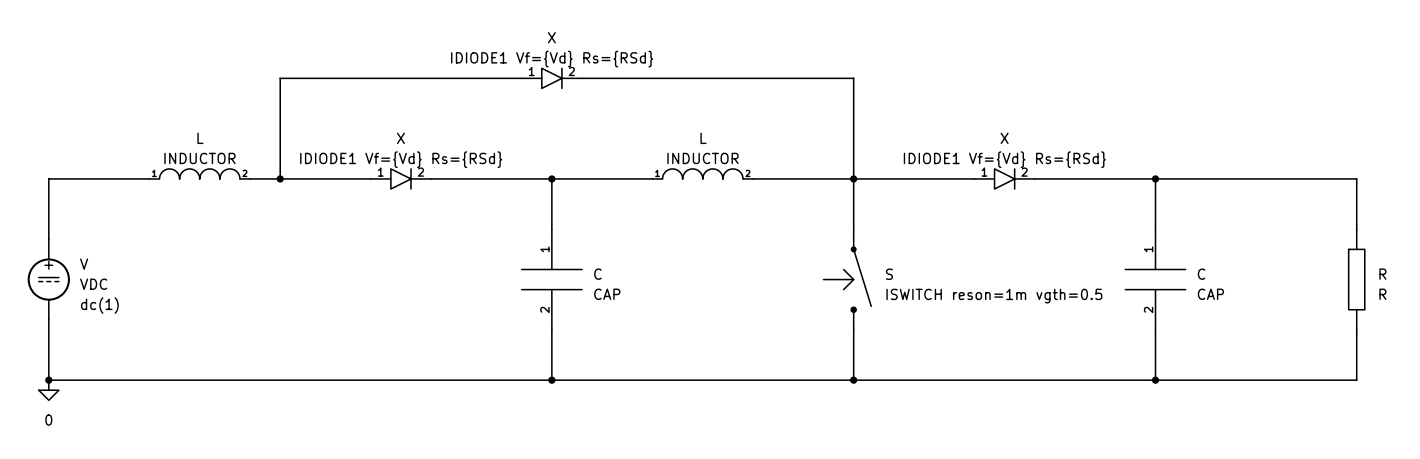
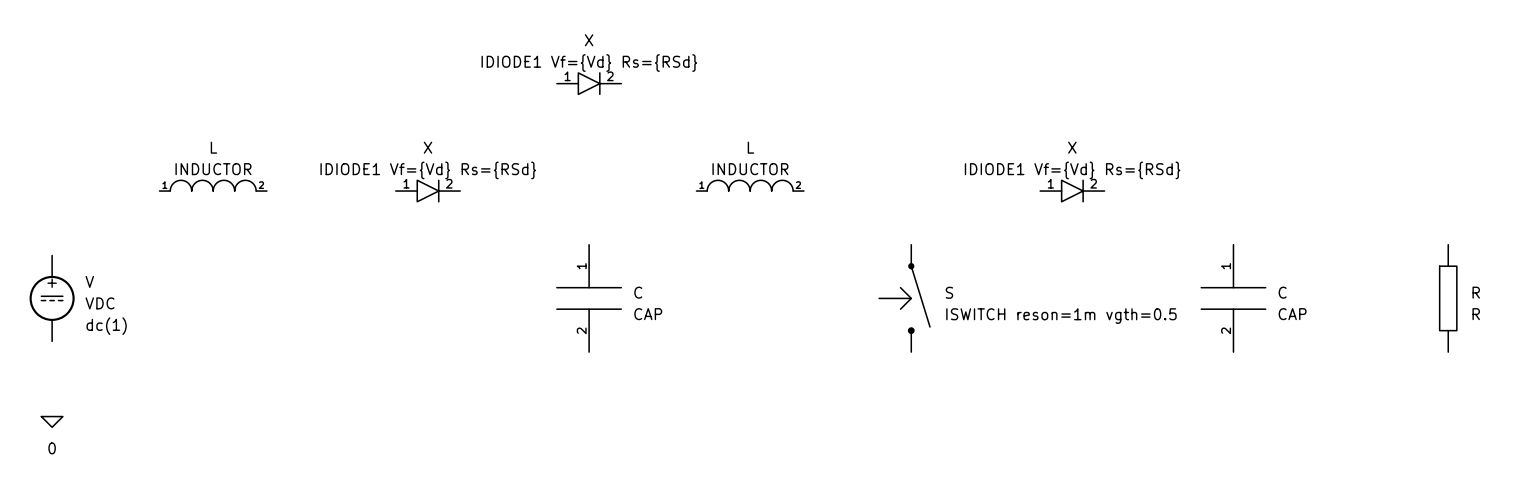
wire: (521, 78) (280, 78) (280, 178) -> none
wire: (582, 78) (853, 78) (853, 229) -> none
wire: (149, 178) (48, 178) (48, 239) -> none
wire: (250, 178) (370, 178) -> none
junction: (280, 178) -> none
wire: (431, 178) (652, 178) -> none
wire: (551, 178) (551, 229) -> none
junction: (551, 178) -> none
wire: (753, 178) (974, 178) -> none
junction: (853, 178) -> none
wire: (1034, 178) (1356, 178) (1356, 229) -> none
wire: (1155, 178) (1155, 229) -> none
junction: (1155, 178) -> none
wire: (48, 319) (48, 390) -> none
wire: (551, 329) (551, 380) -> none
wire: (853, 329) (853, 380) -> none
wire: (1155, 329) (1155, 380) -> none
wire: (1356, 329) (1356, 380) (48, 380) -> none
junction: (48, 380) -> none
junction: (551, 380) -> none
junction: (853, 380) -> none
junction: (1155, 380) -> none

